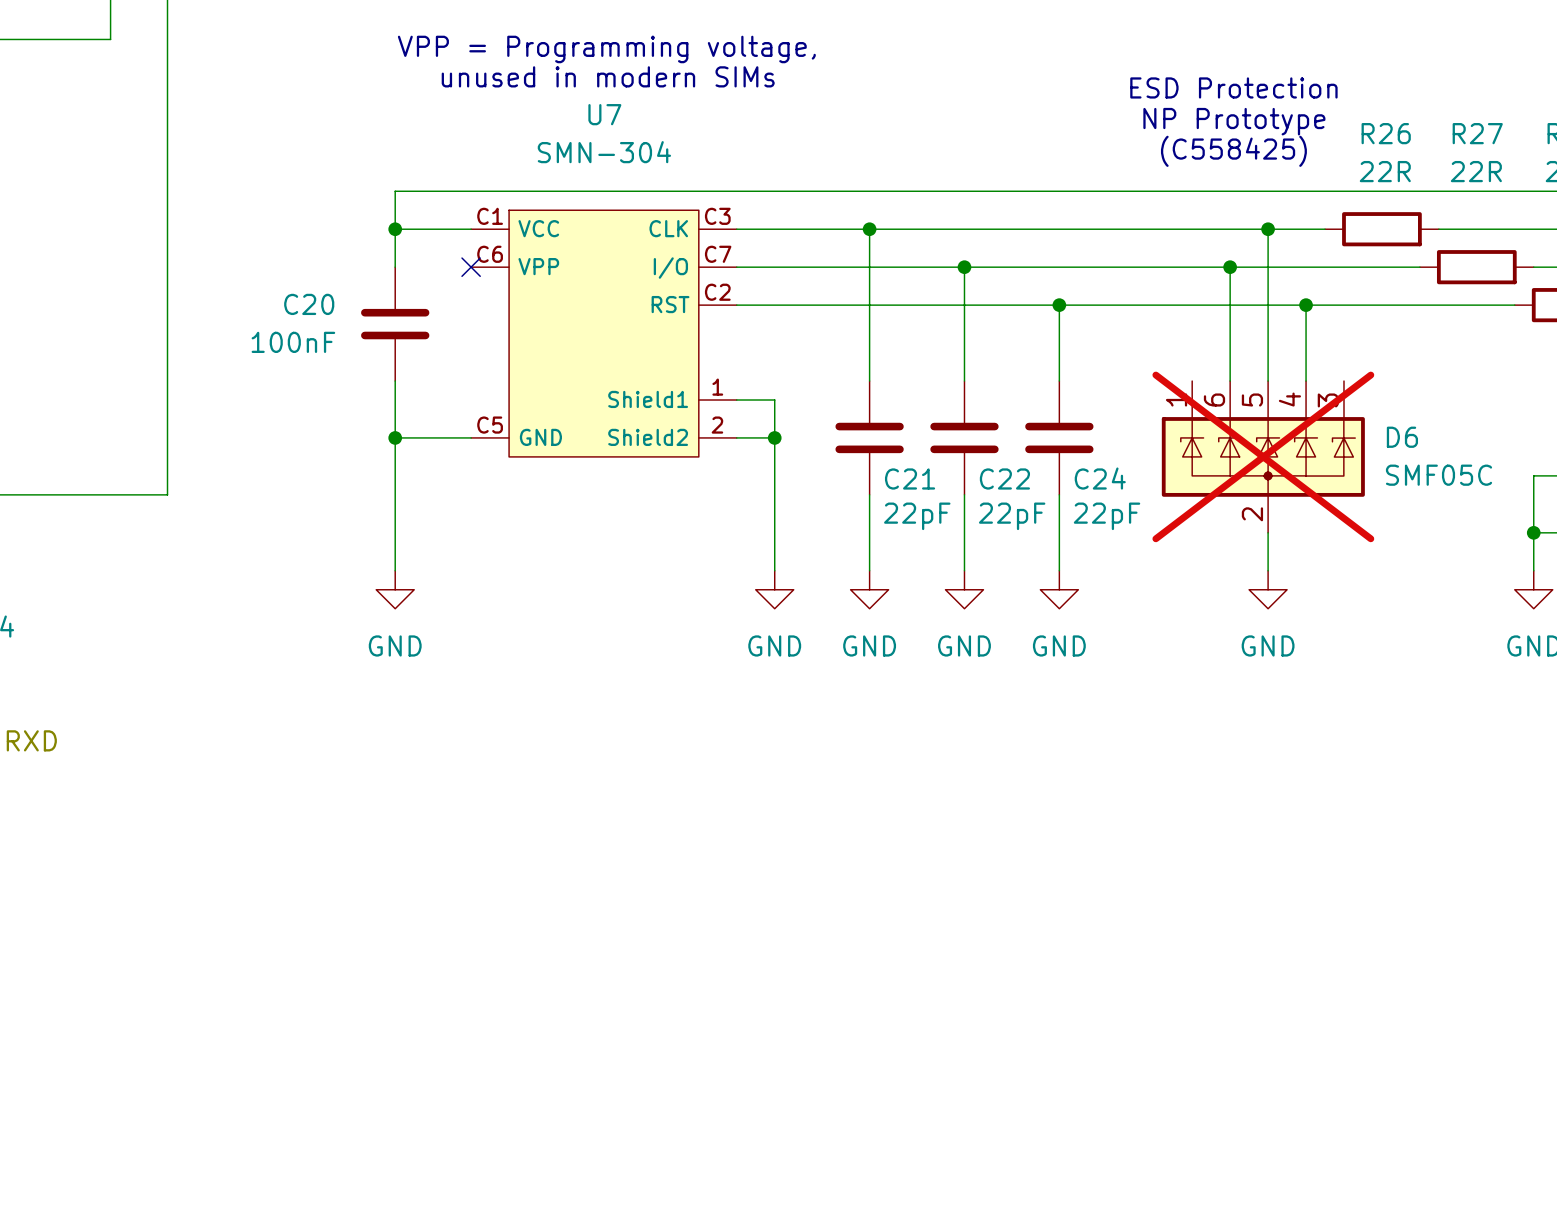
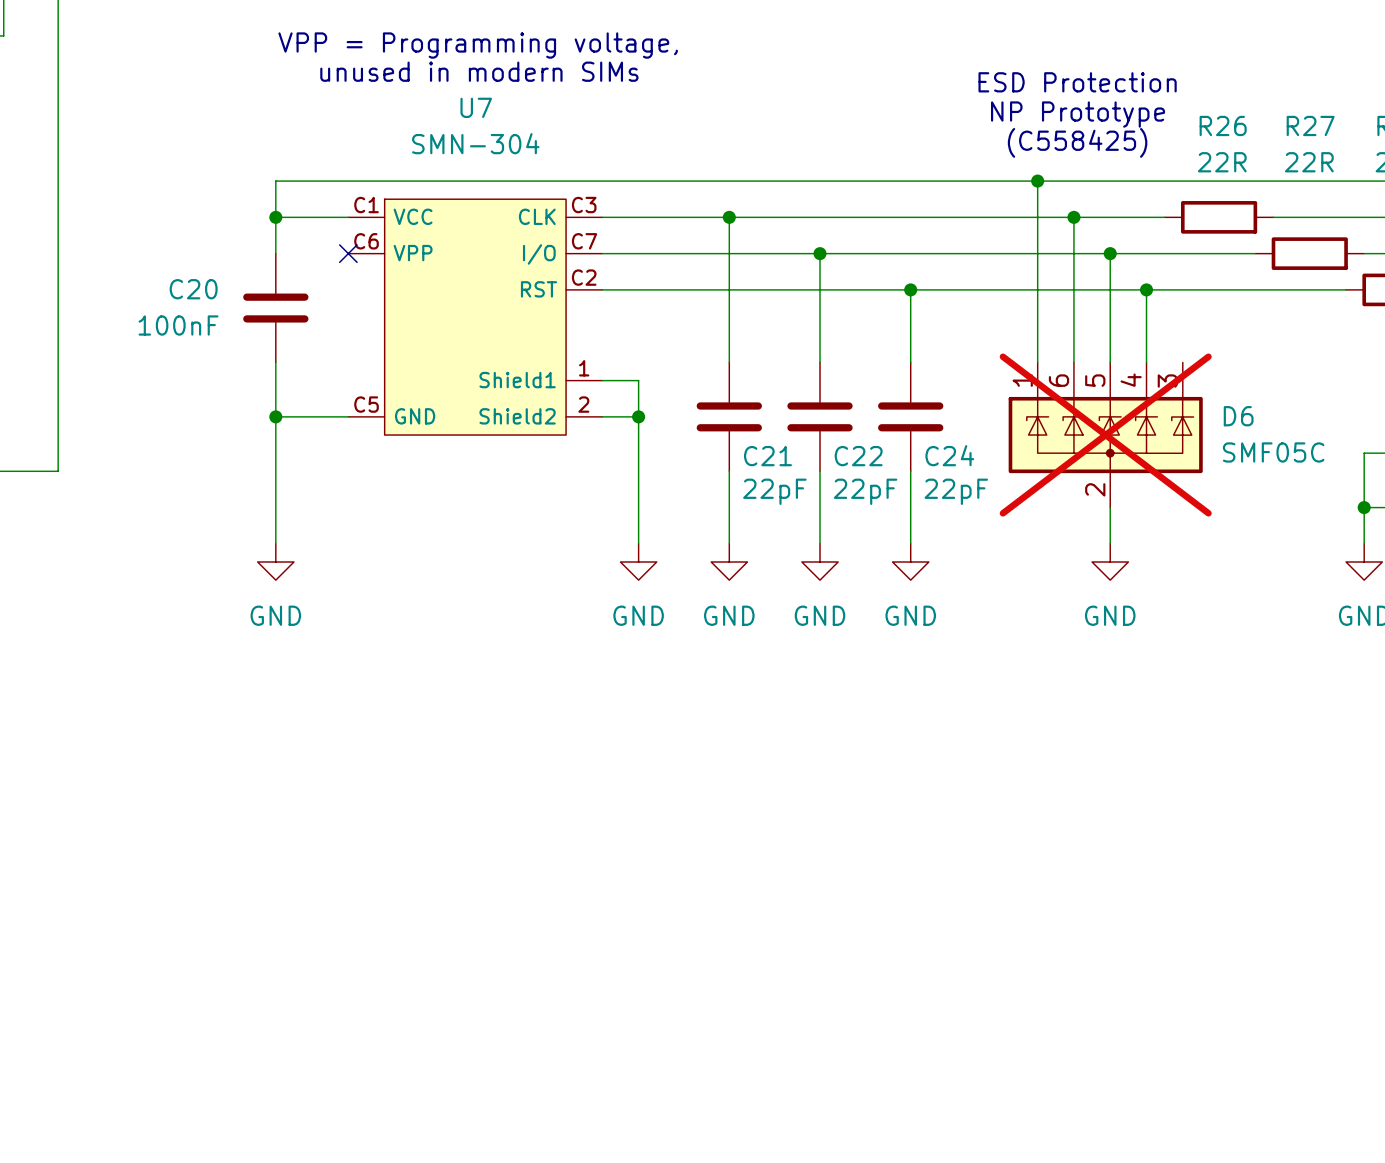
wire: none -> (1037, 181) (1037, 362)
junction: none -> (1037, 181)
junction: none -> (1073, 217)
wire: (1268, 229) (1268, 267) -> (1073, 217) (1073, 253)
junction: (1268, 229) -> none
junction: (1230, 267) -> none
junction: none -> (1110, 253)

